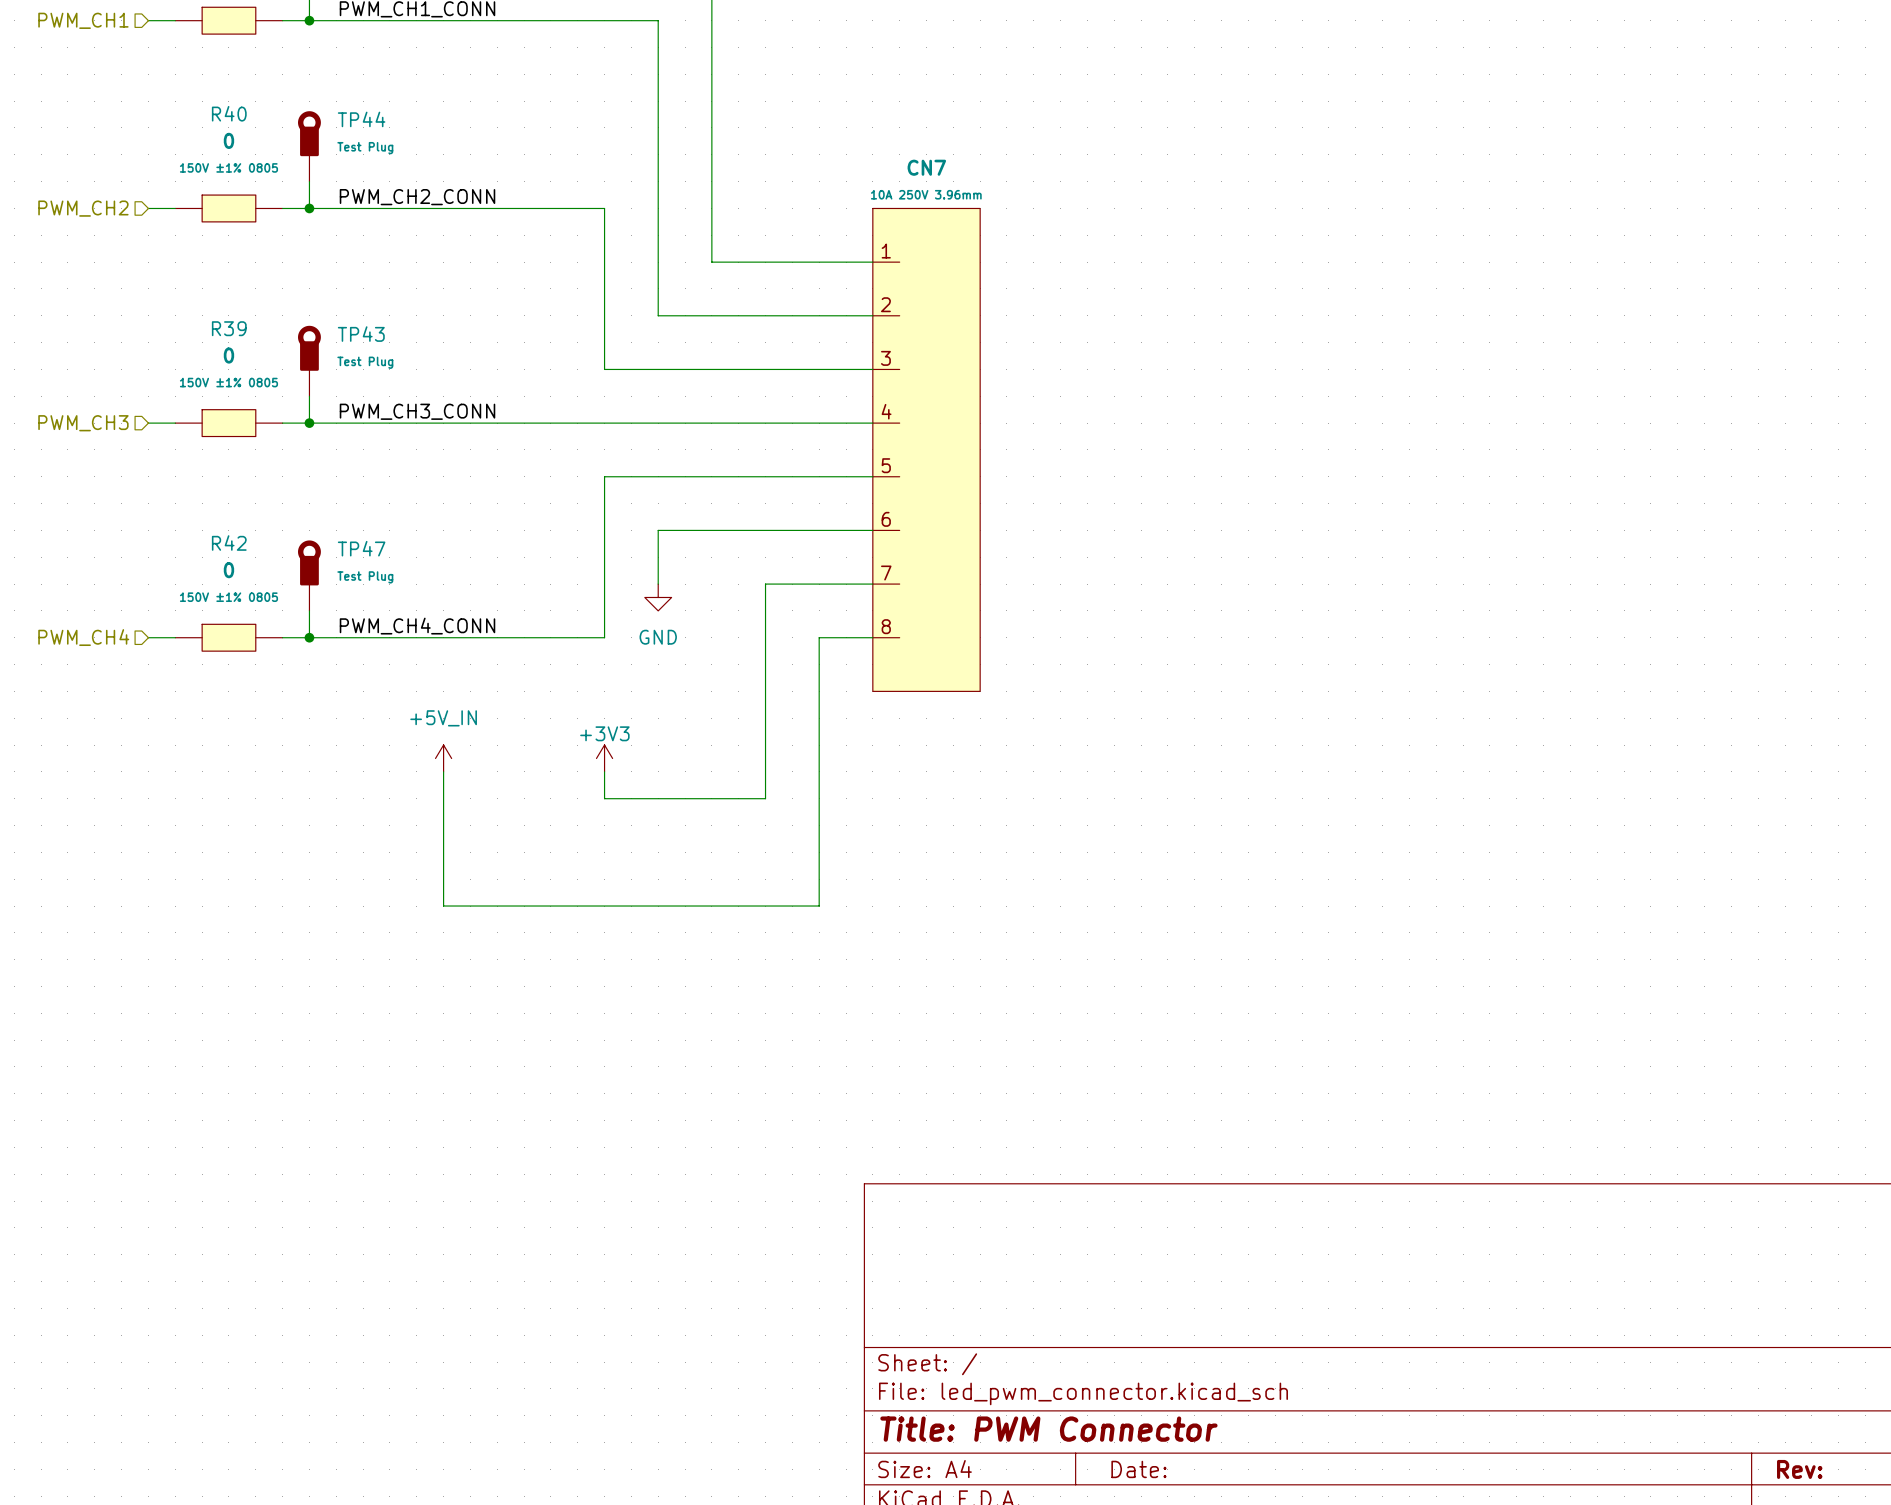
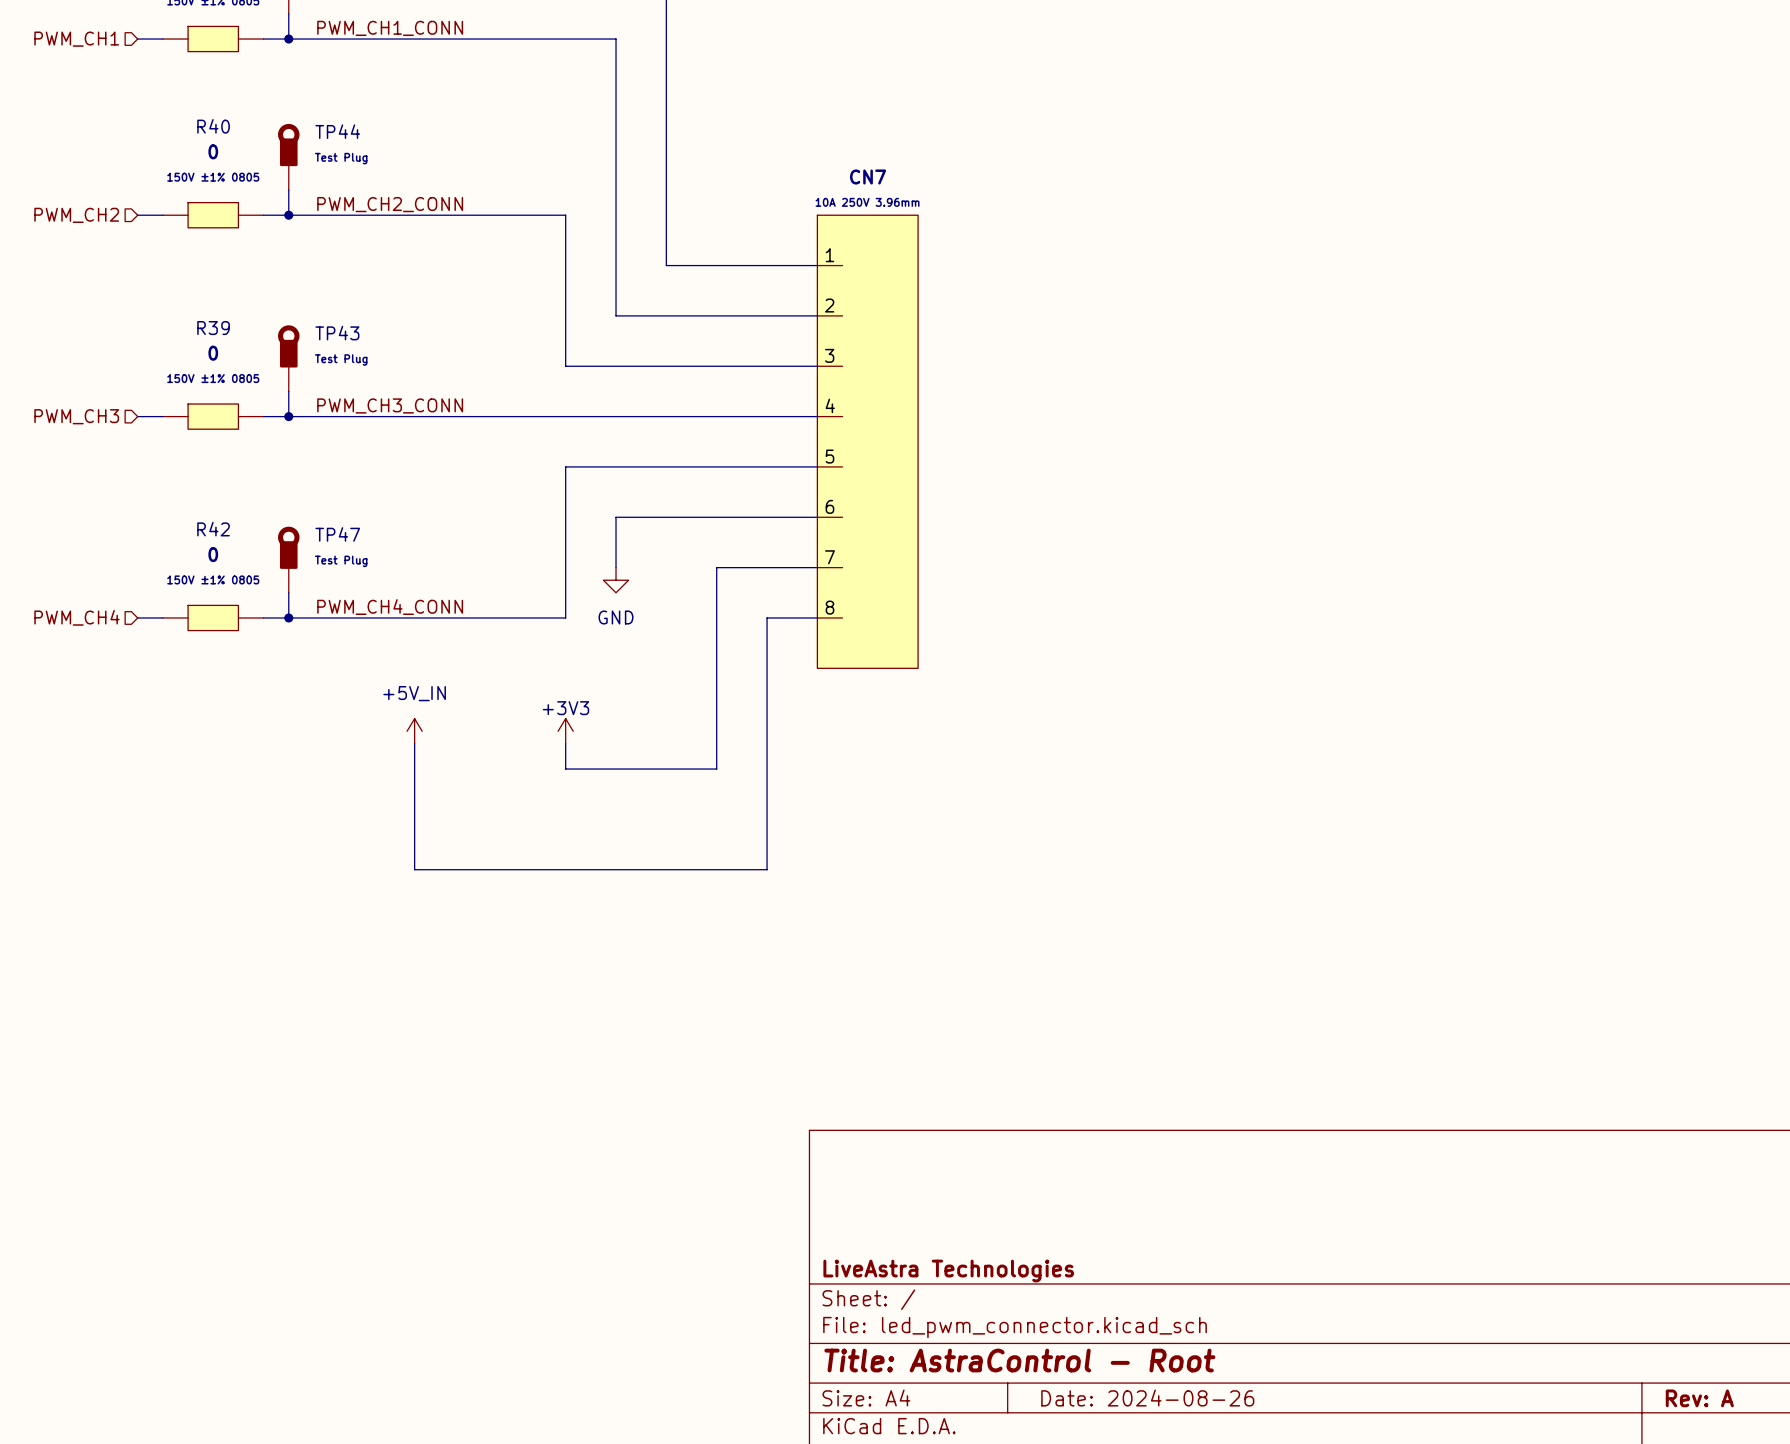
title block: none -> LiveAstra Technologies (948, 1271)
title block: Title: PWM Connector (1048, 1429) -> Title: AstraControl - Root (1019, 1360)
title block: Date: (1138, 1469) -> Date: 2024-08-26 (1147, 1398)
title block: Rev: (1799, 1469) -> Rev: A (1699, 1398)

